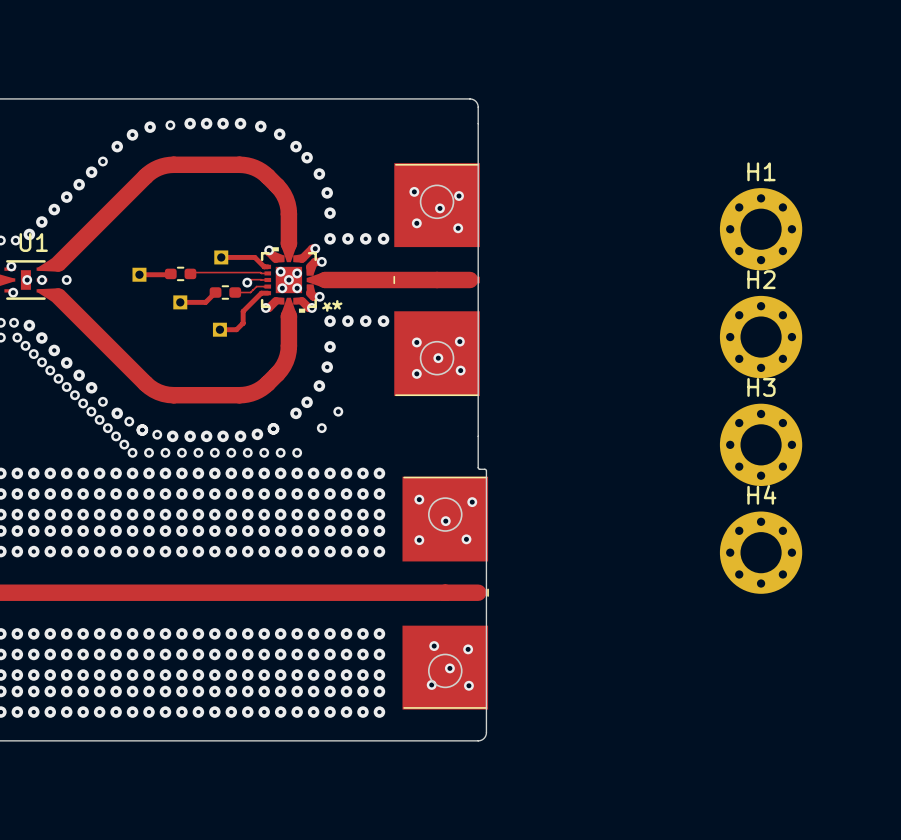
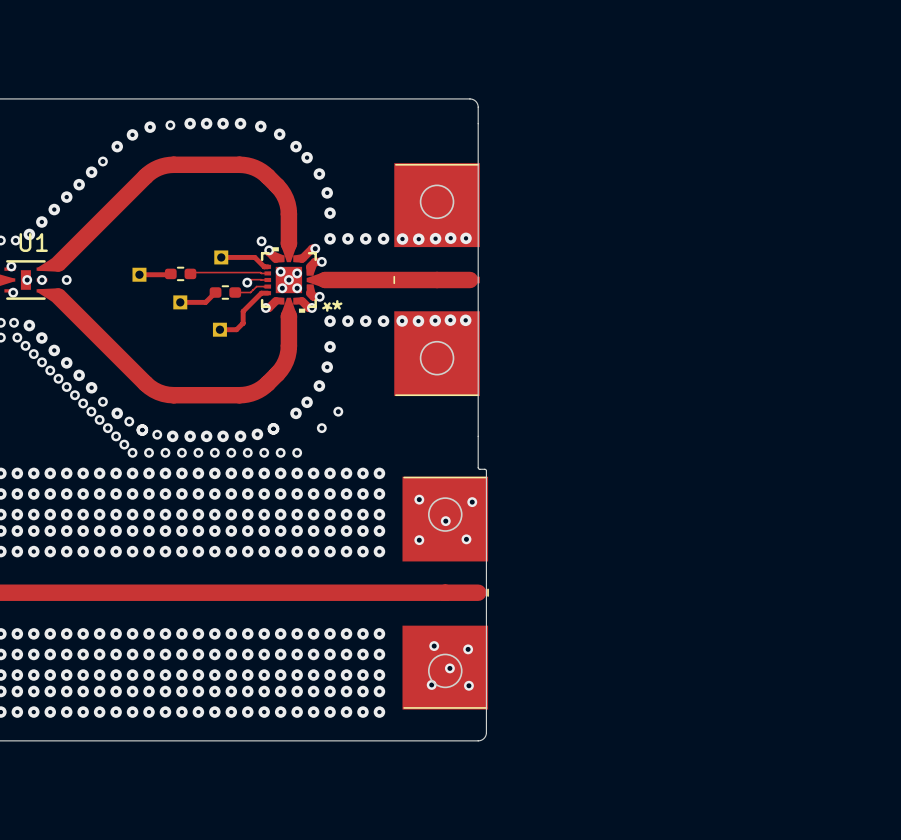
via: (414, 191) -> none
via: (459, 196) -> none
via: (439, 208) -> none
via: (416, 223) -> none
via: (458, 228) -> none
H1: (761, 229) -> none
via: none -> (435, 238)
via: none -> (450, 238)
via: none -> (466, 238)
via: none -> (402, 239)
via: none -> (418, 239)
via: none -> (261, 241)
via: none -> (402, 320)
via: none -> (435, 320)
via: none -> (450, 320)
via: none -> (465, 320)
via: none -> (418, 321)
H2: (761, 337) -> none
via: (459, 341) -> none
via: (416, 342) -> none
via: (438, 358) -> none
via: (460, 370) -> none
via: (416, 373) -> none
H3: (761, 444) -> none
H4: (761, 552) -> none

